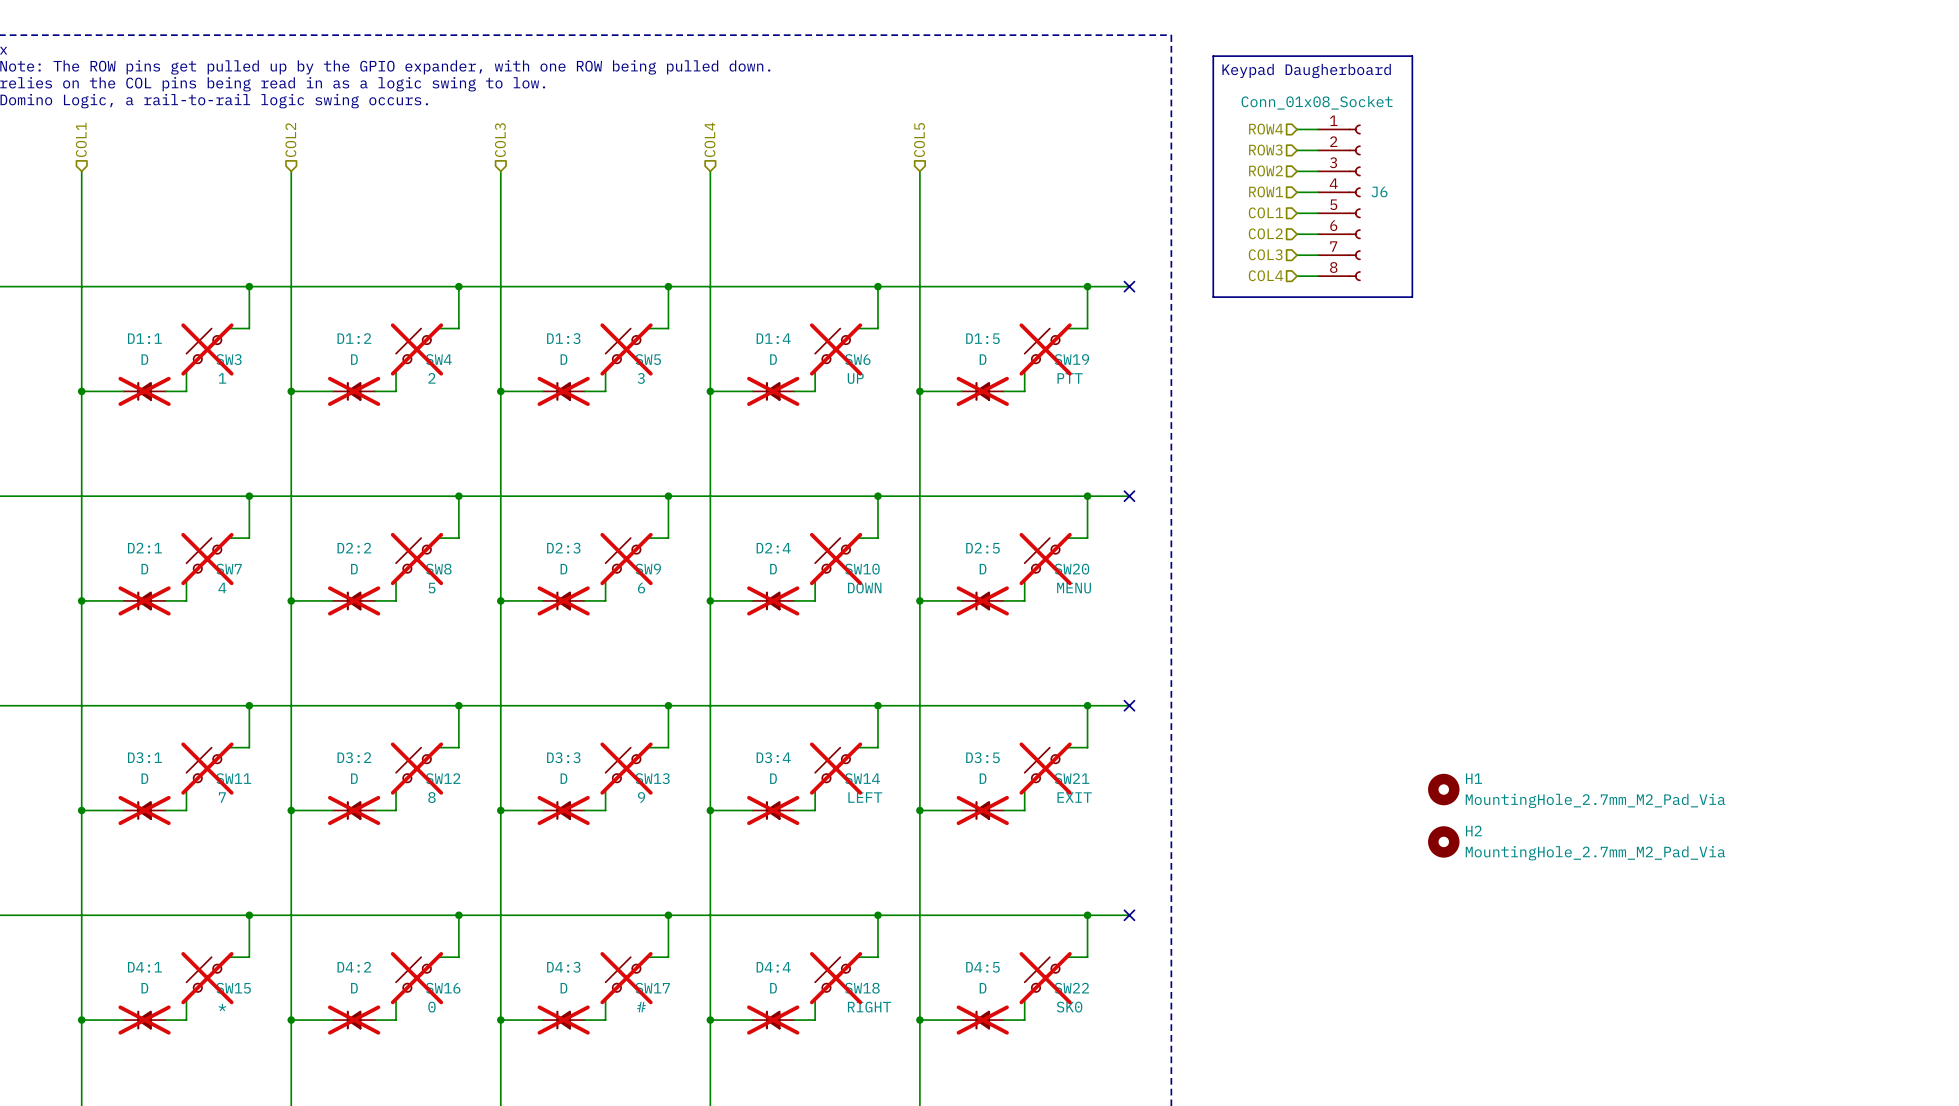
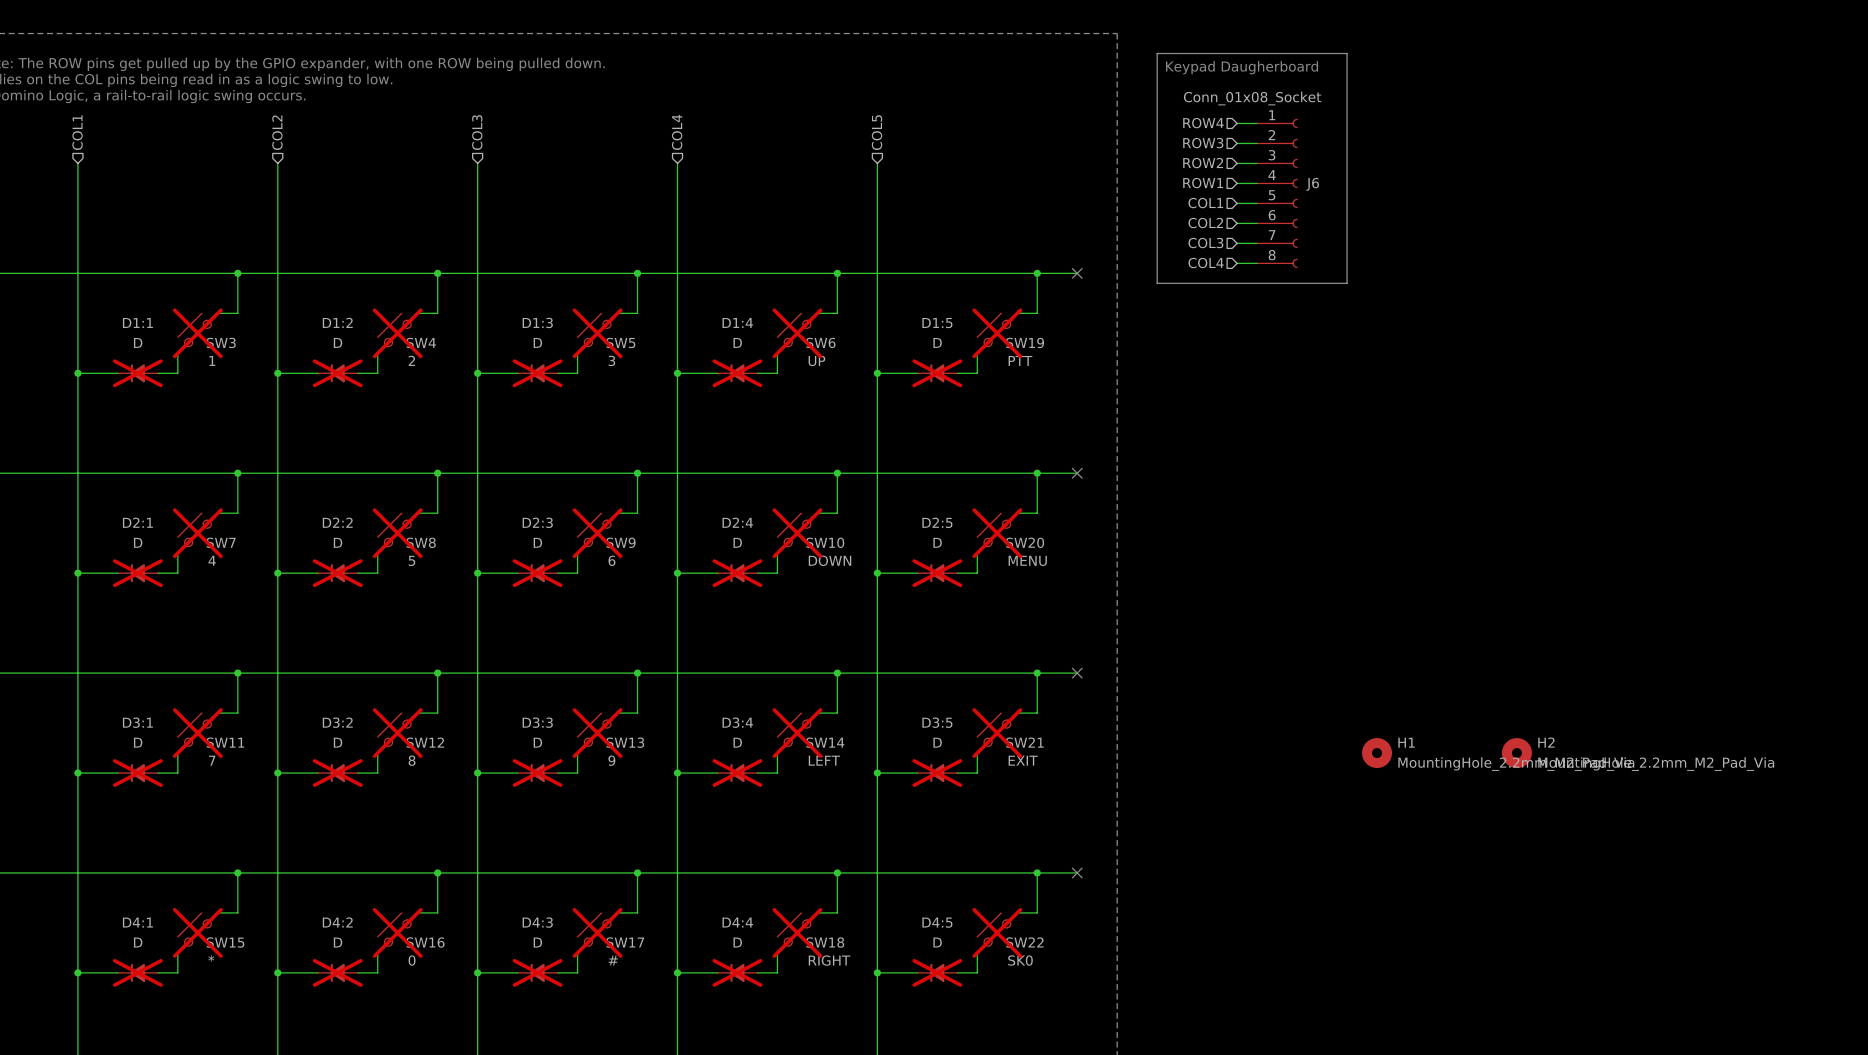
H1 value: MountingHole_2.7mm_M2_Pad_Via (1595, 800) -> MountingHole_2.2mm_M2_Pad_Via (1516, 764)
H2 position: (1443, 841) -> (1516, 753)
H2 value: MountingHole_2.7mm_M2_Pad_Via (1595, 853) -> MountingHole_2.2mm_M2_Pad_Via (1656, 764)

